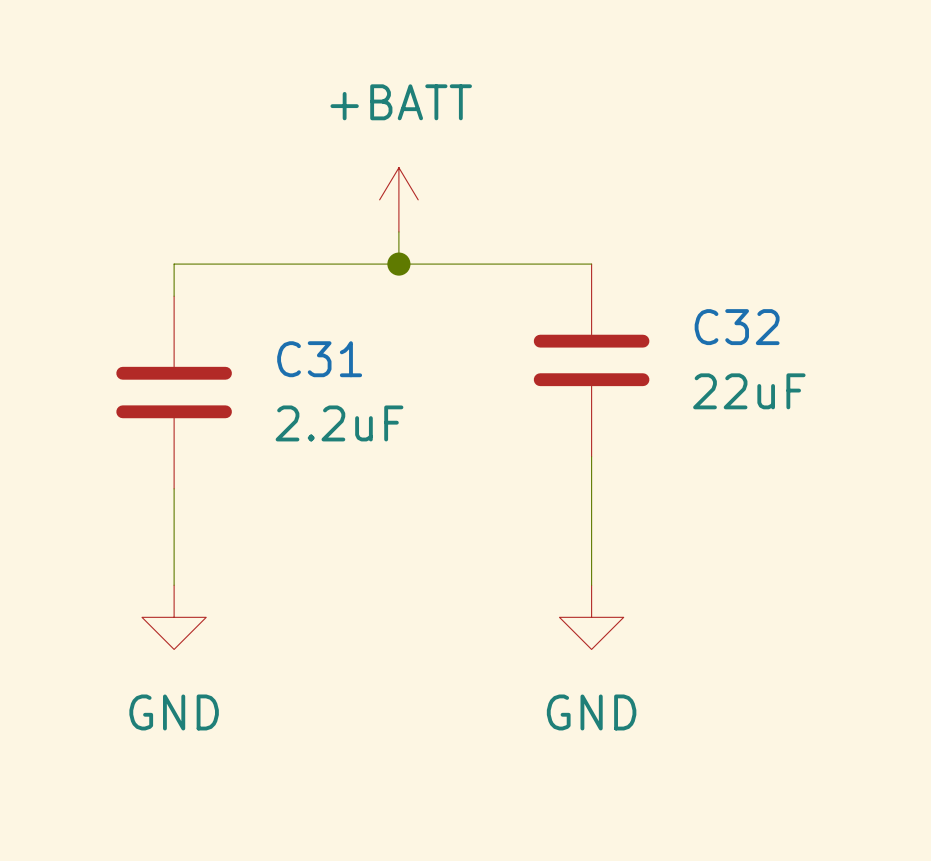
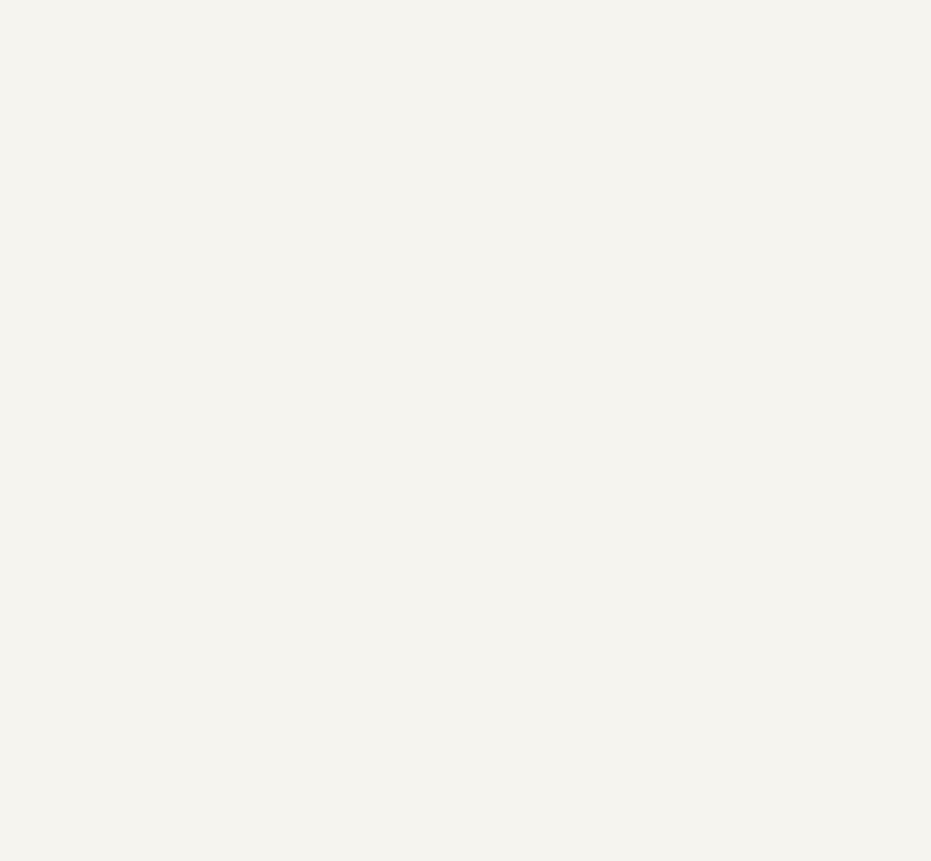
power symbol: +BATT (398, 199) -> none
wire: (398, 231) (398, 264) -> none
junction: (398, 264) -> none
wire: (591, 264) (174, 264) (174, 296) -> none
C32: 22uF (591, 360) -> none
C31: 2.2uF (174, 392) -> none
wire: (591, 456) (591, 585) -> none
wire: (174, 488) (174, 585) -> none
power symbol: GND (174, 617) -> none
power symbol: GND (591, 617) -> none

